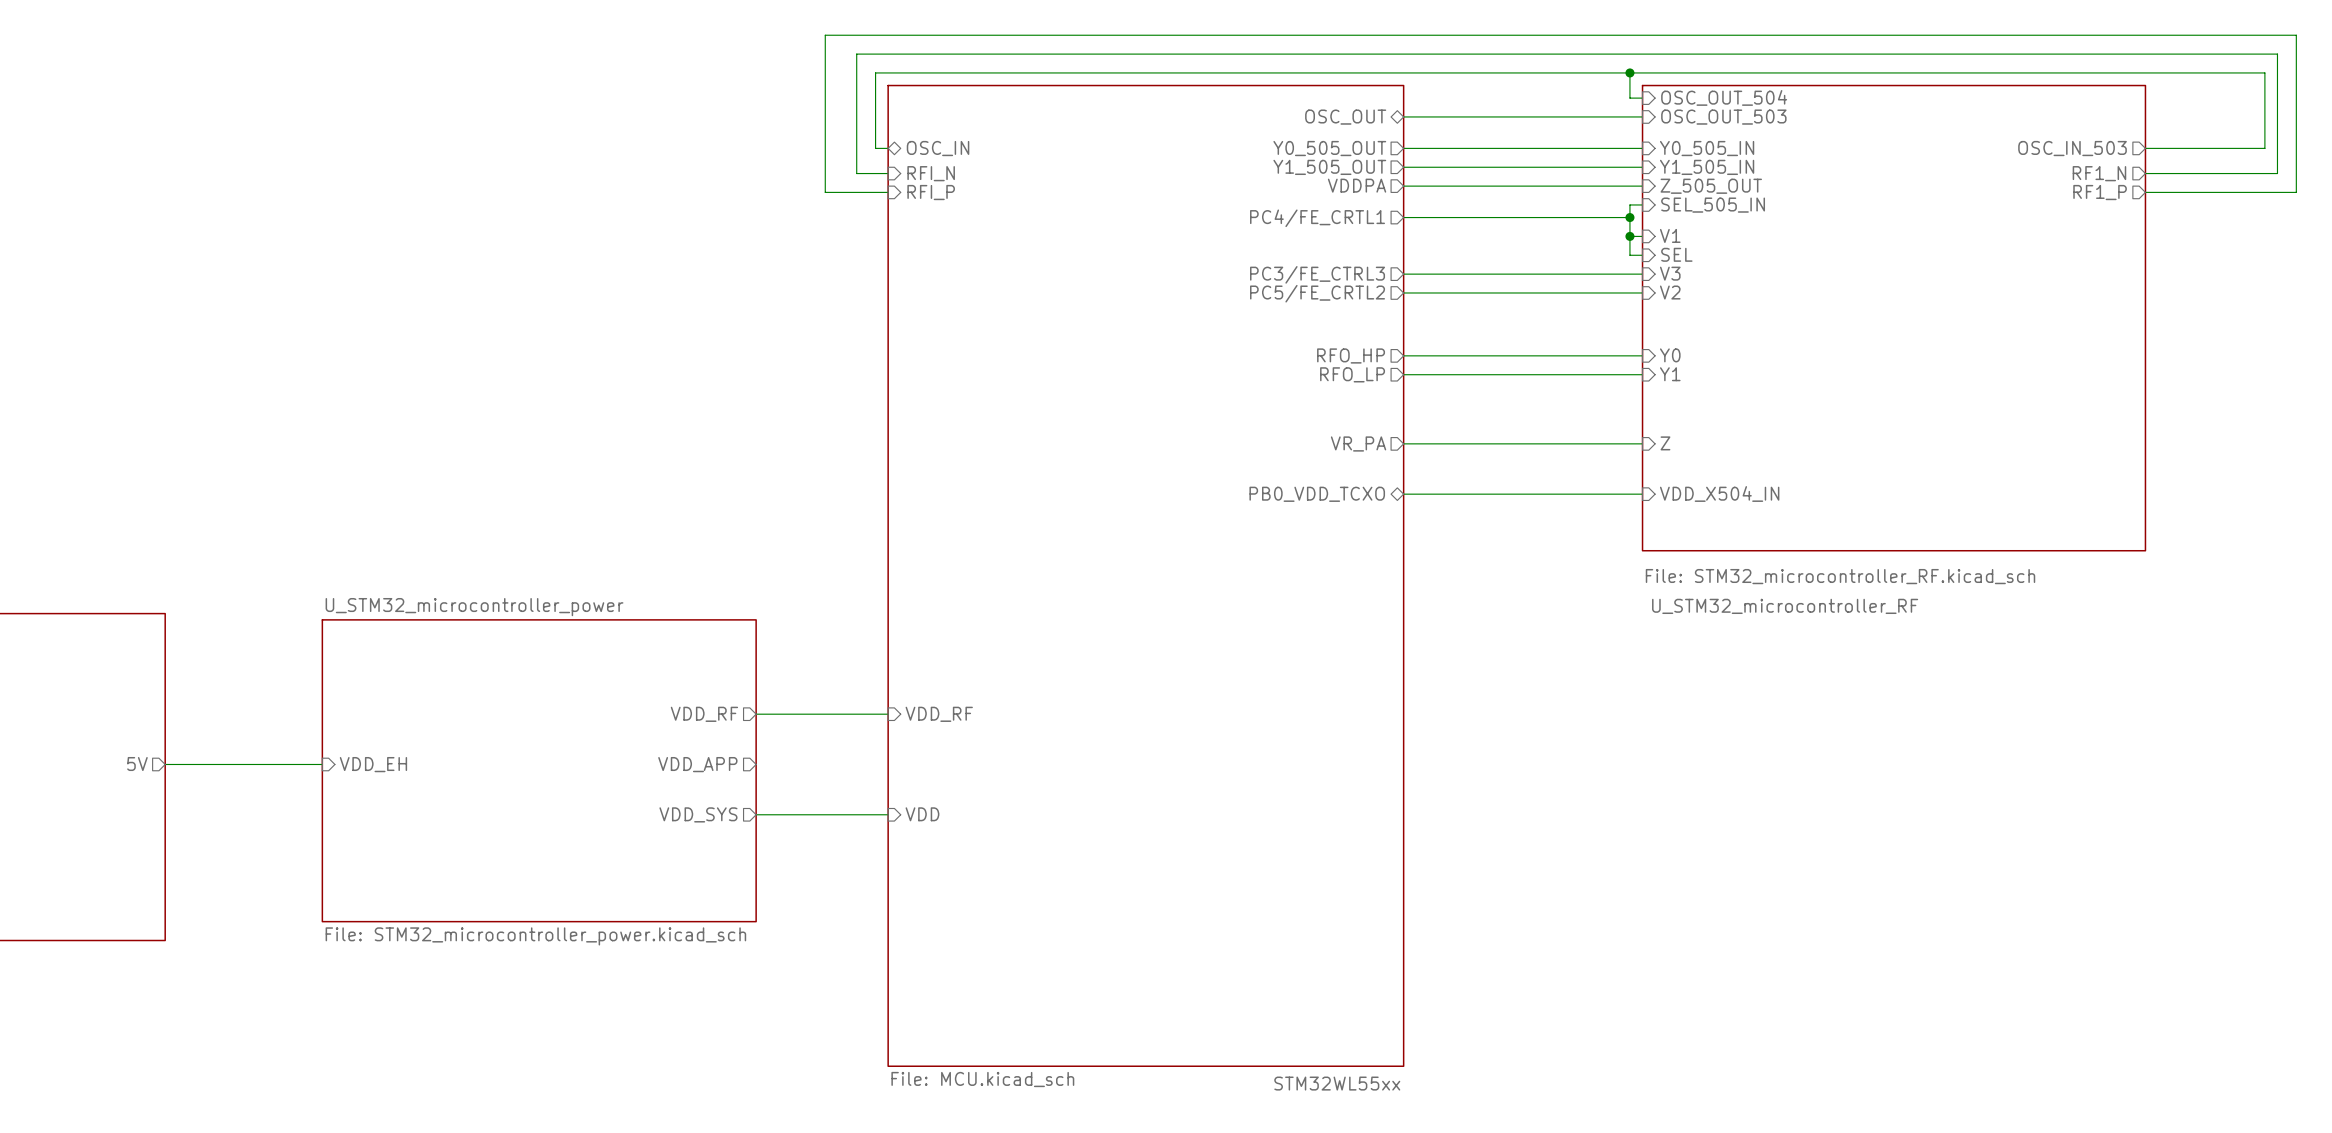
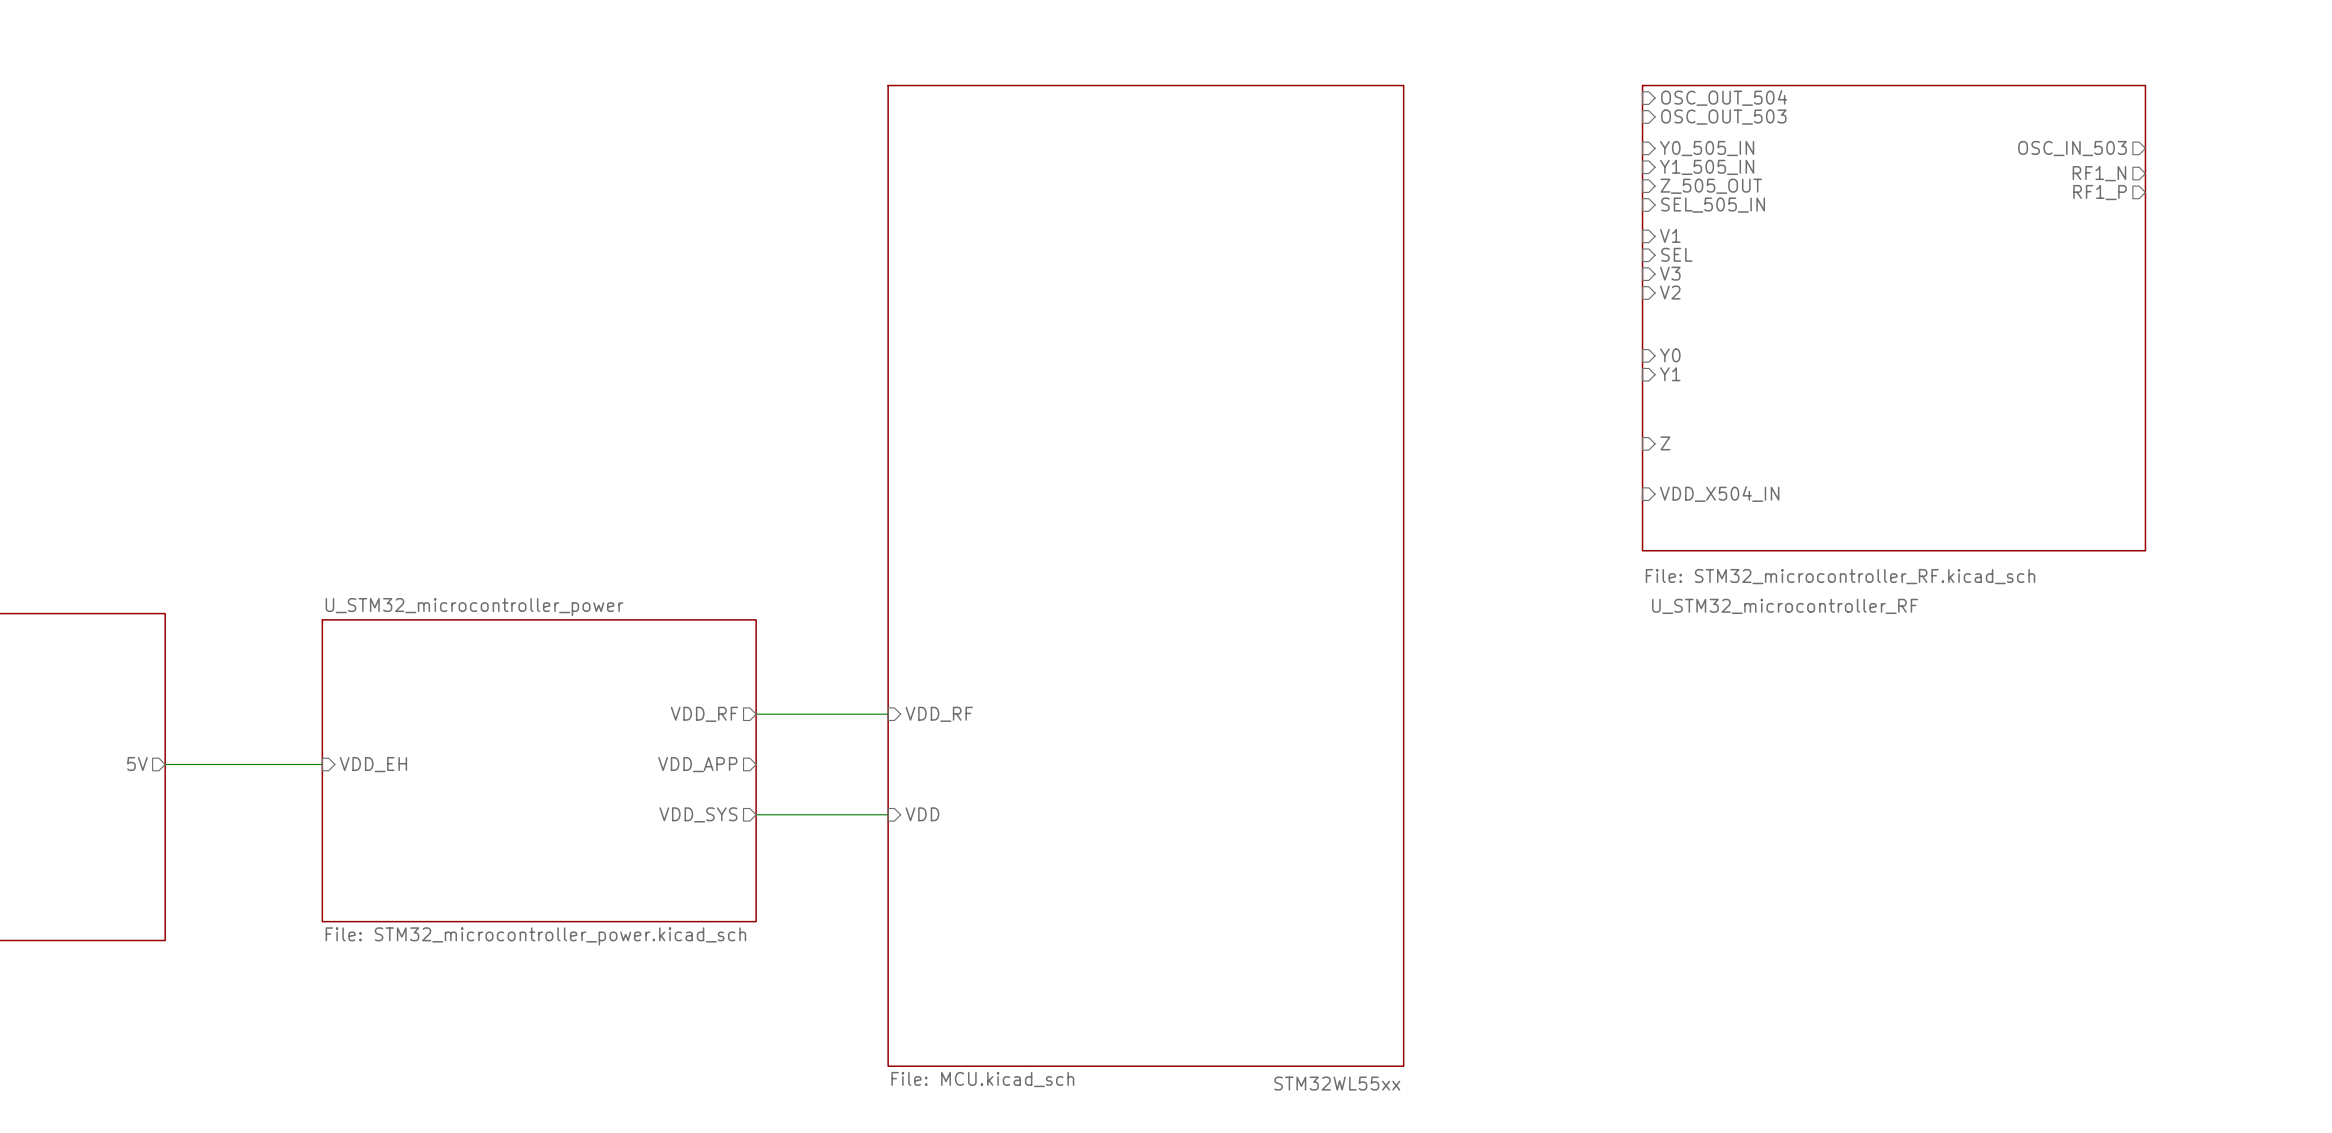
wire: (1629, 72) (1629, 98) (1642, 98) -> none
junction: (1629, 72) -> none
wire: (1403, 116) (1642, 116) -> none
sheet pin: OSC_OUT (1345, 117) -> none
wire: (888, 148) (875, 148) (875, 72) (2264, 72) (2264, 148) (2145, 148) -> none
sheet pin: OSC_IN (938, 148) -> none
sheet pin: Y0_505_OUT (1329, 148) -> none
wire: (1403, 148) (1642, 148) -> none
sheet pin: Y1_505_OUT (1329, 167) -> none
wire: (1403, 167) (1642, 167) -> none
wire: (888, 173) (856, 173) (856, 54) (2277, 54) (2277, 173) (2145, 173) -> none
sheet pin: RFI_N (931, 173) -> none
sheet pin: VDDPA (1357, 185) -> none
wire: (1403, 186) (1642, 186) -> none
wire: (888, 192) (825, 192) (825, 35) (2296, 35) (2296, 192) (2145, 192) -> none
sheet pin: RFI_P (931, 192) -> none
wire: (1642, 204) (1629, 204) (1629, 255) (1642, 255) -> none
wire: (1403, 217) (1629, 217) -> none
junction: (1629, 217) -> none
sheet pin: PC4/FE_CRTL1 (1317, 218) -> none
wire: (1629, 236) (1642, 236) -> none
junction: (1629, 236) -> none
sheet pin: PC3/FE_CTRL3 (1317, 274) -> none
wire: (1403, 274) (1642, 274) -> none
wire: (1403, 292) (1642, 292) -> none
sheet pin: PC5/FE_CRTL2 (1317, 293) -> none
sheet pin: RFO_HP (1351, 355) -> none
wire: (1403, 355) (1642, 355) -> none
sheet pin: RFO_LP (1352, 374) -> none
wire: (1403, 374) (1642, 374) -> none
sheet pin: VR_PA (1358, 443) -> none
wire: (1403, 443) (1642, 443) -> none
sheet pin: PB0_VDD_TCXO (1317, 494) -> none
wire: (1403, 494) (1642, 494) -> none

